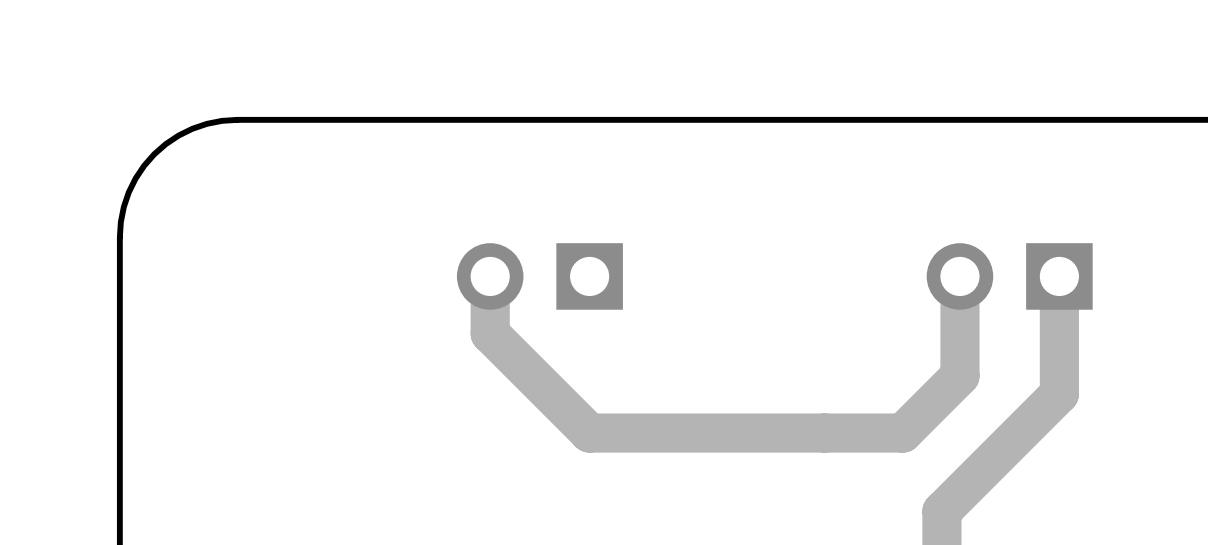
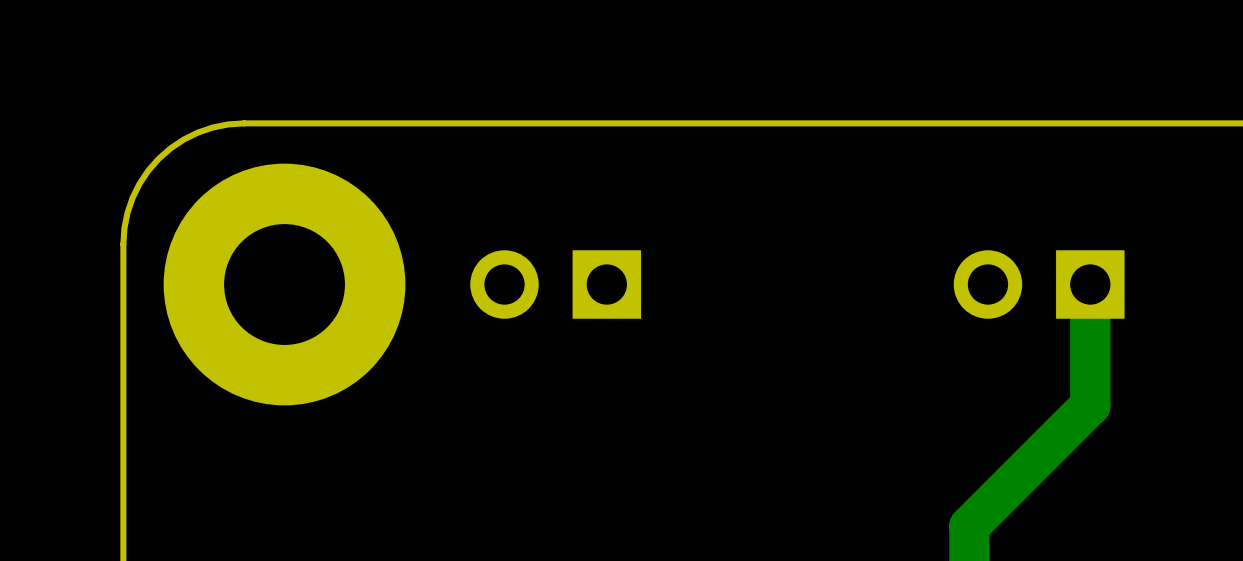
part: none -> (284, 284)
track: (959, 276) (959, 375) (902, 433) (589, 433) (490, 333) (490, 276) -> none

